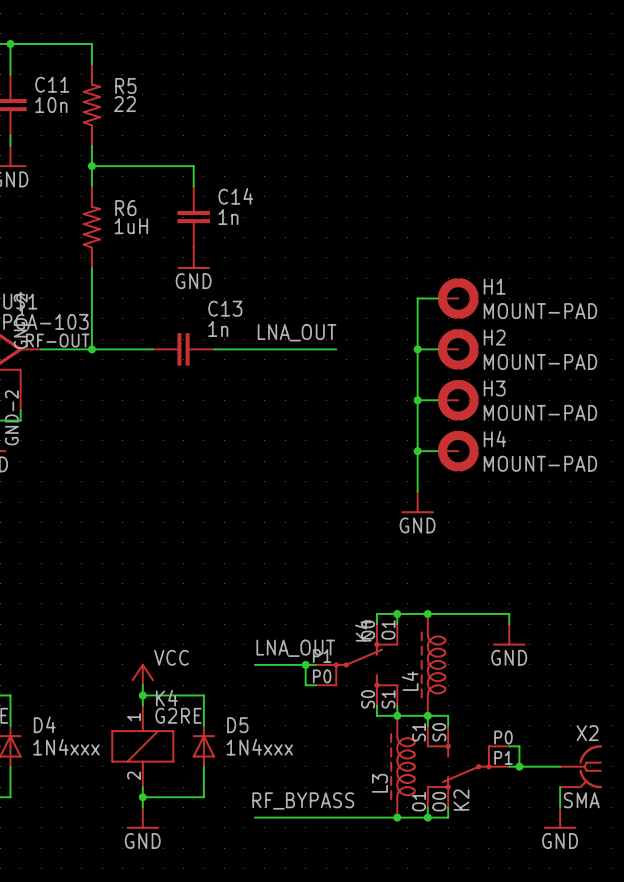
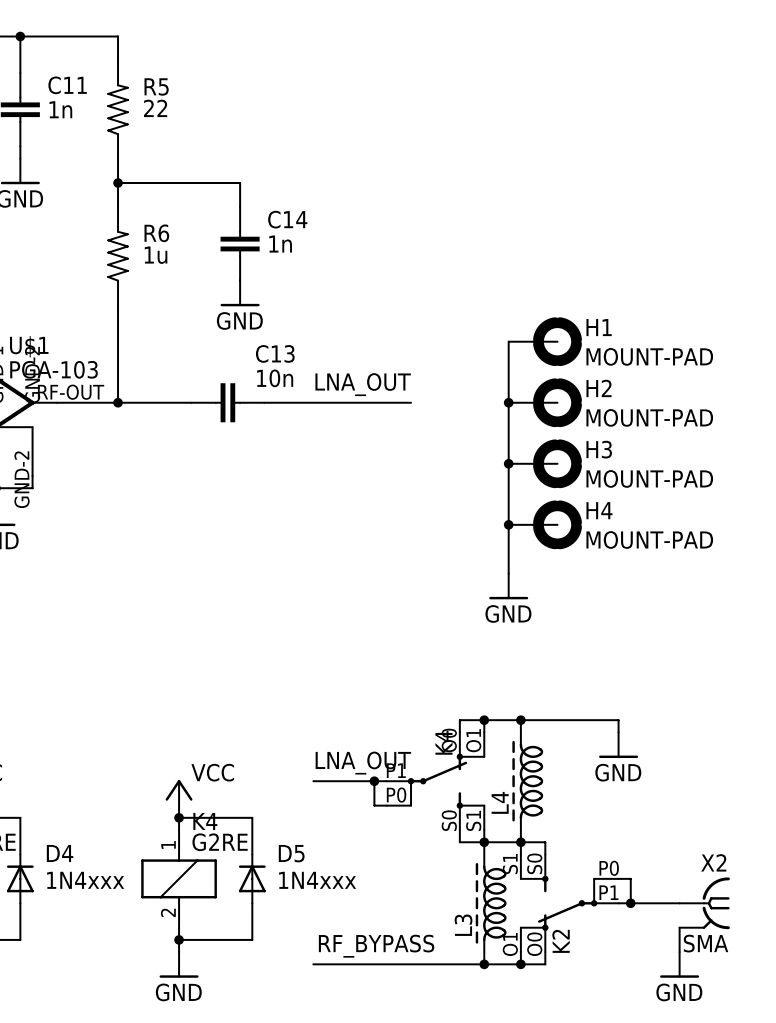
C11 value: 10n (51, 105) -> 1n (60, 109)
R6 value: 1uH (131, 226) -> 1u (156, 255)
C13 value: 1n (218, 329) -> 10n (275, 378)

